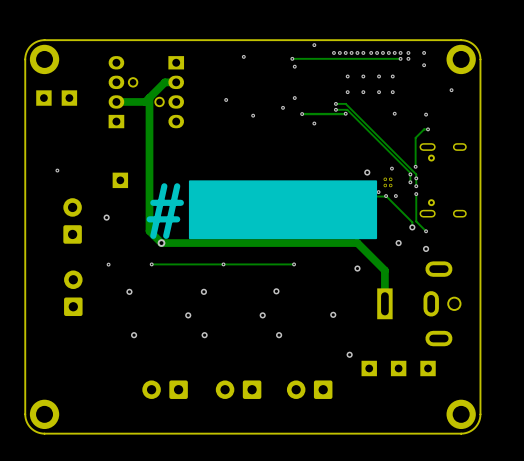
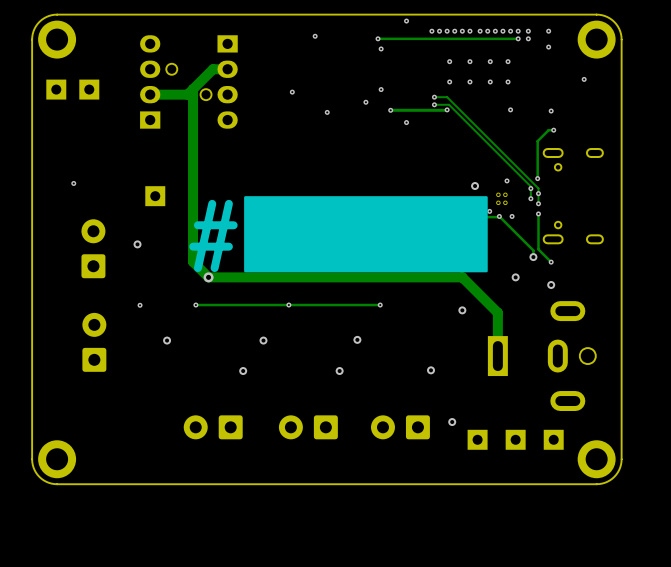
via: (134, 335) -> none
via: (204, 335) -> none
via: (279, 335) -> none
board edge: (480, 383) (479, 420) (473, 429) (461, 433) (42, 433) (32, 429) (26, 420) (25, 383) -> (621, 459) (619, 470) (614, 476) (604, 482) (596, 484) (57, 484) (46, 481) (39, 476) (34, 470) (32, 459)
part position: (165, 389) -> (213, 427)
part position: (238, 389) -> (308, 427)
part position: (309, 389) -> (400, 427)
part position: (44, 414) -> (57, 459)
part position: (461, 414) -> (596, 459)

